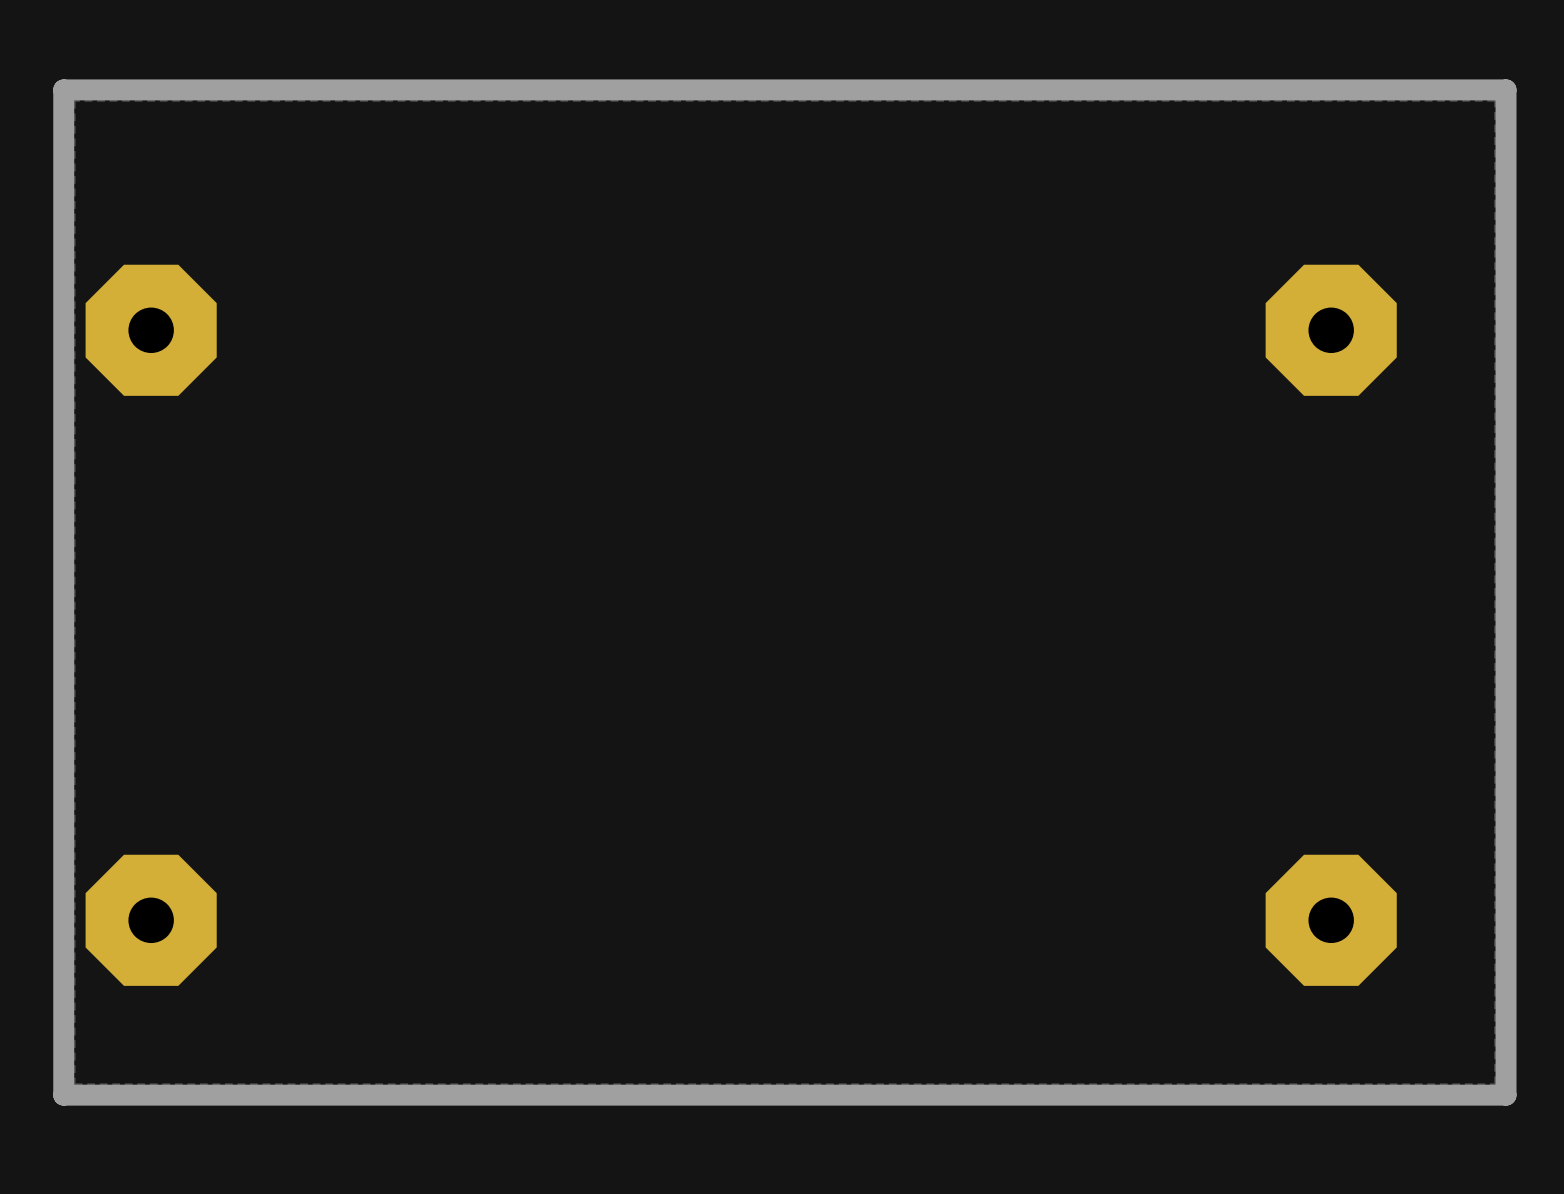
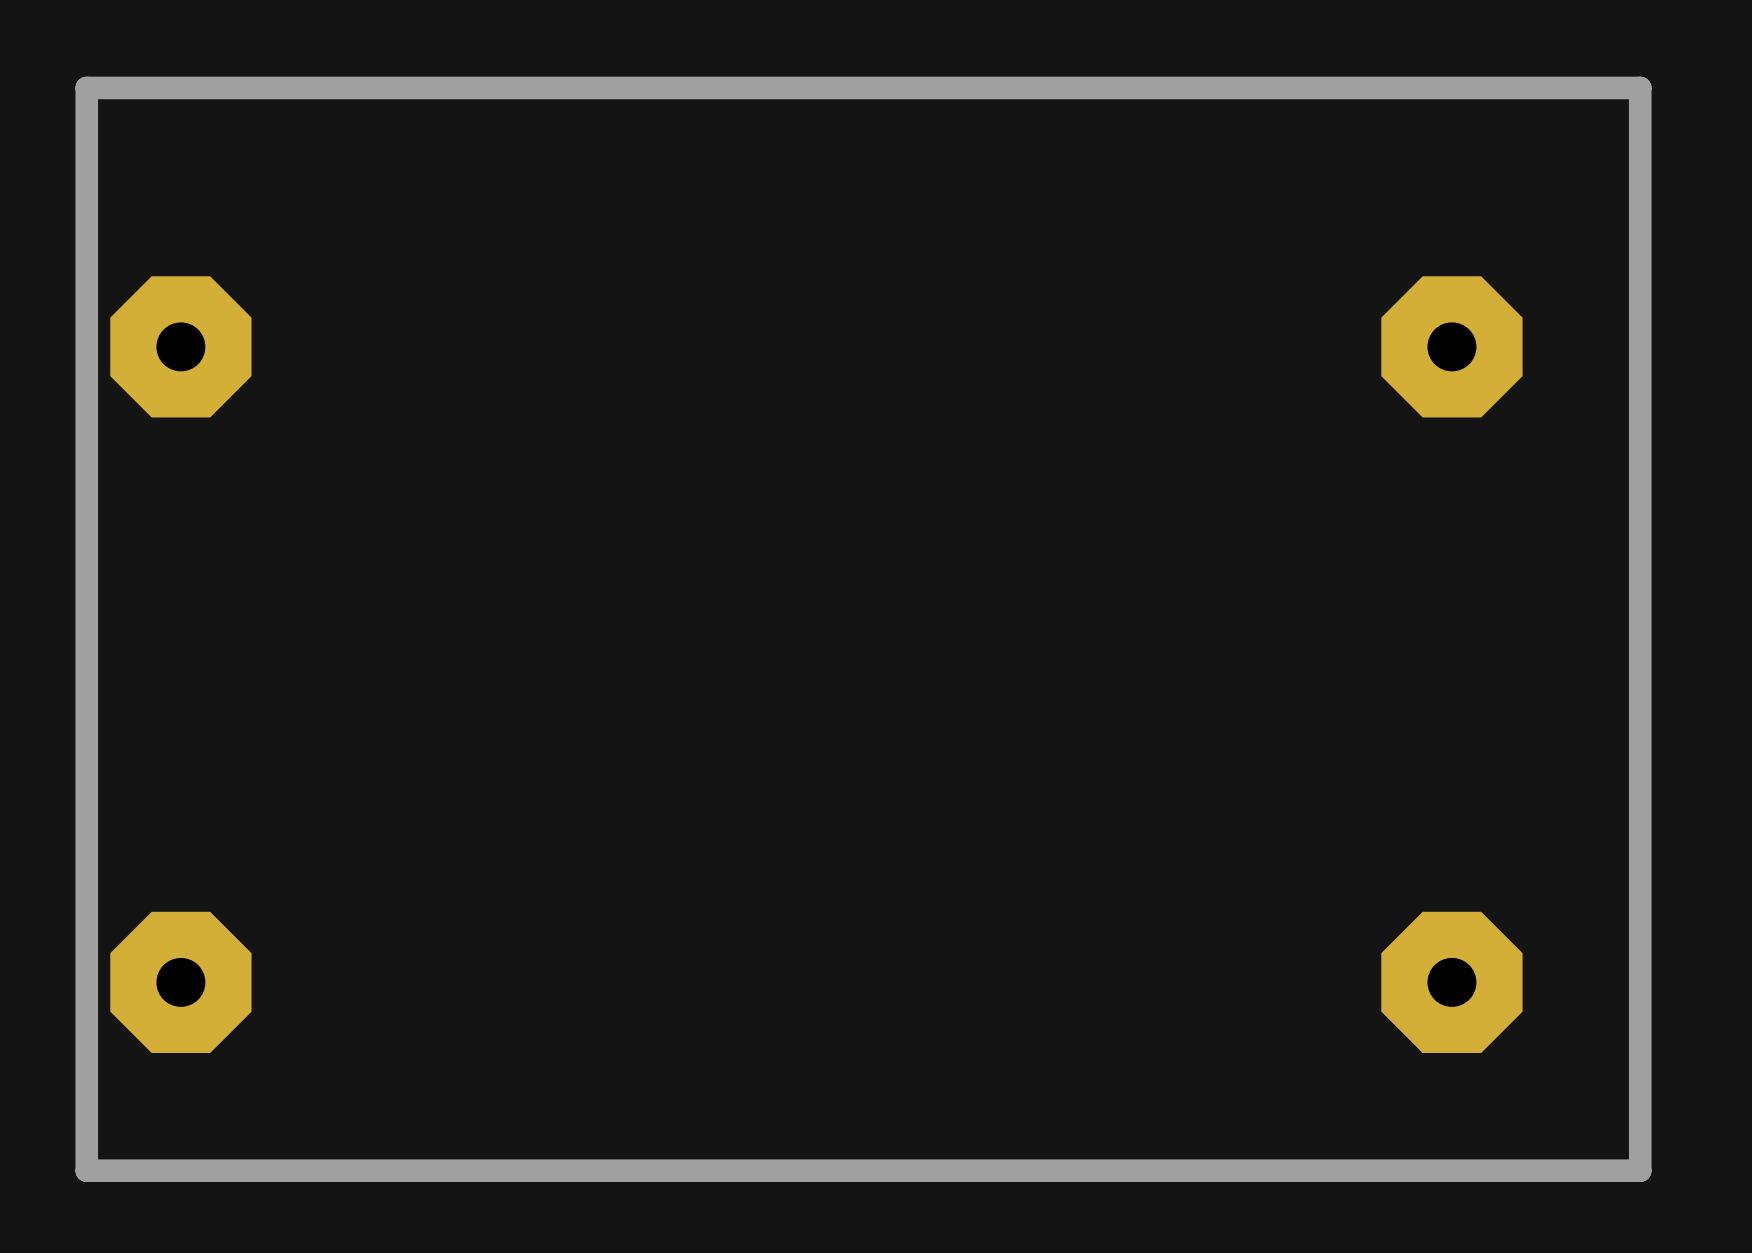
zone outline: (1495, 100) (74, 100) (74, 1084) (1495, 1084) (1495, 100) -> none

